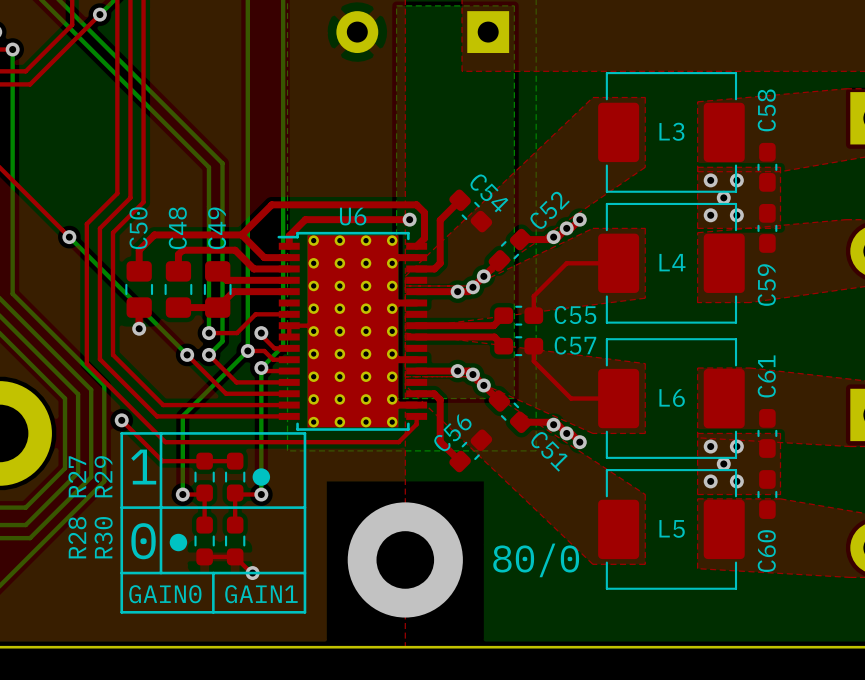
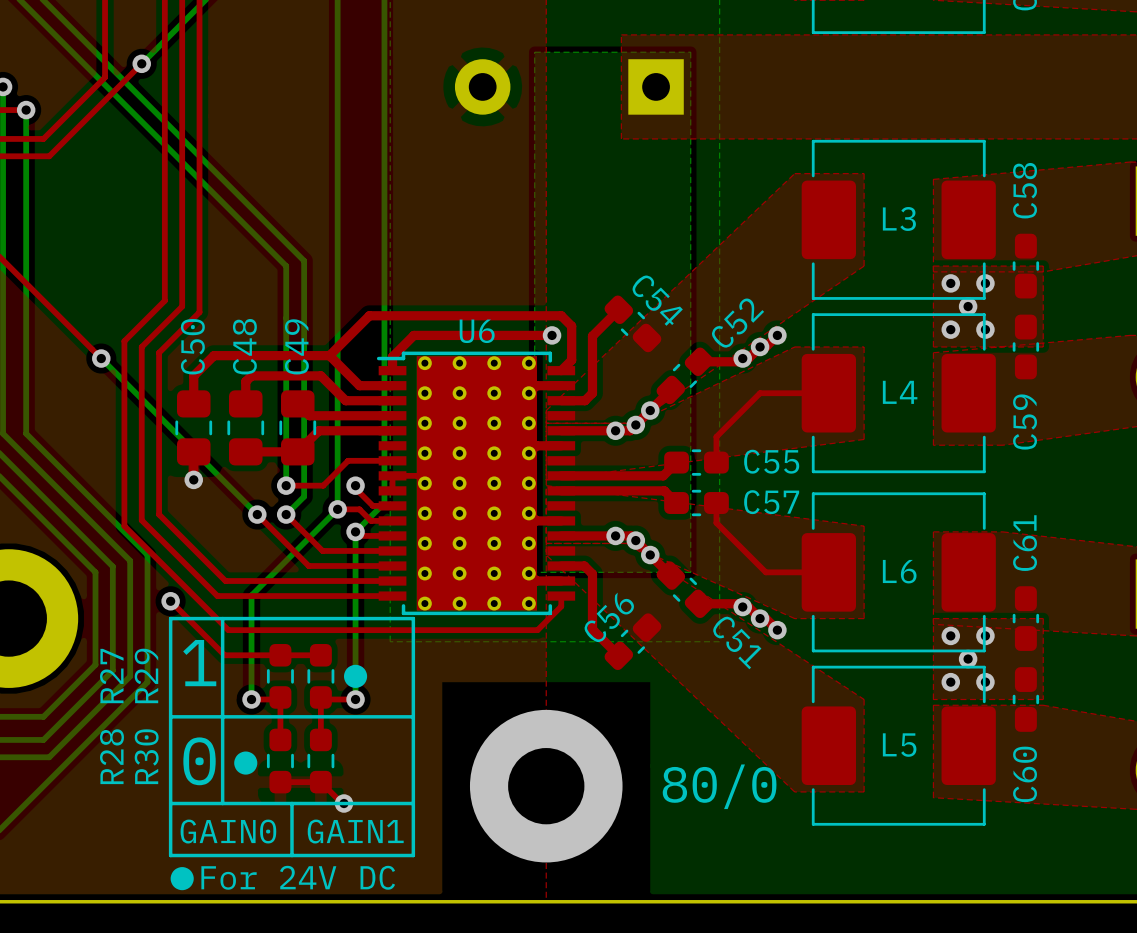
drawing: none -> [170, 867, 194, 891]
text: none -> For 24V DC (298, 877)

